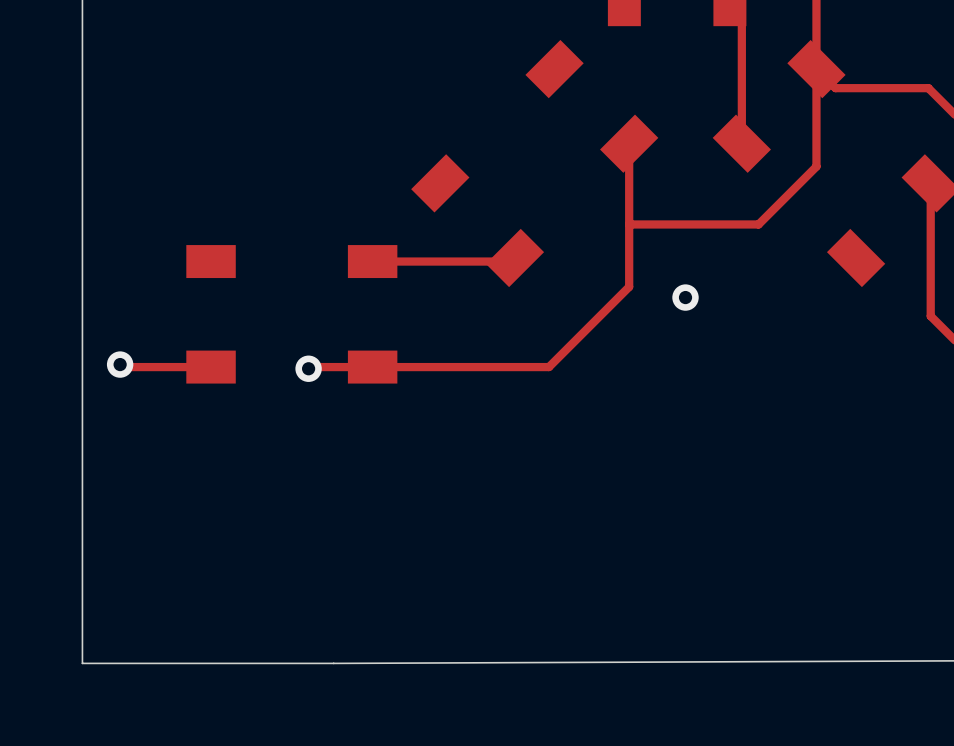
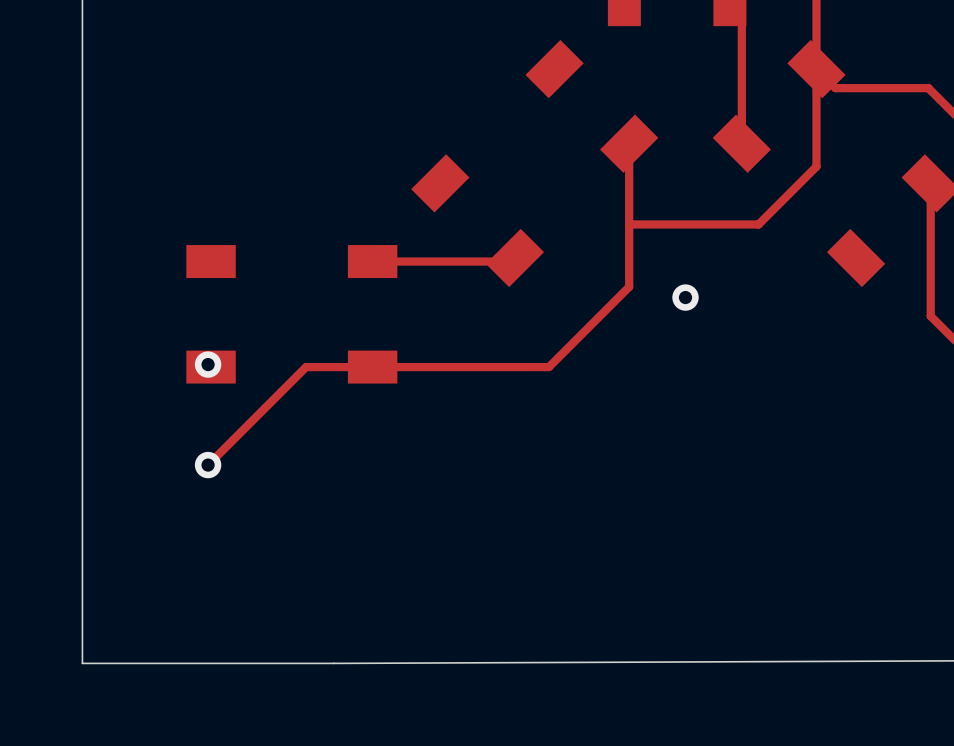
track: (120, 364) (122, 367) (211, 367) -> none
via: (120, 364) -> none
via: none -> (208, 364)
track: none -> (306, 367) (208, 465)
via: (308, 368) -> none
via: none -> (208, 465)

